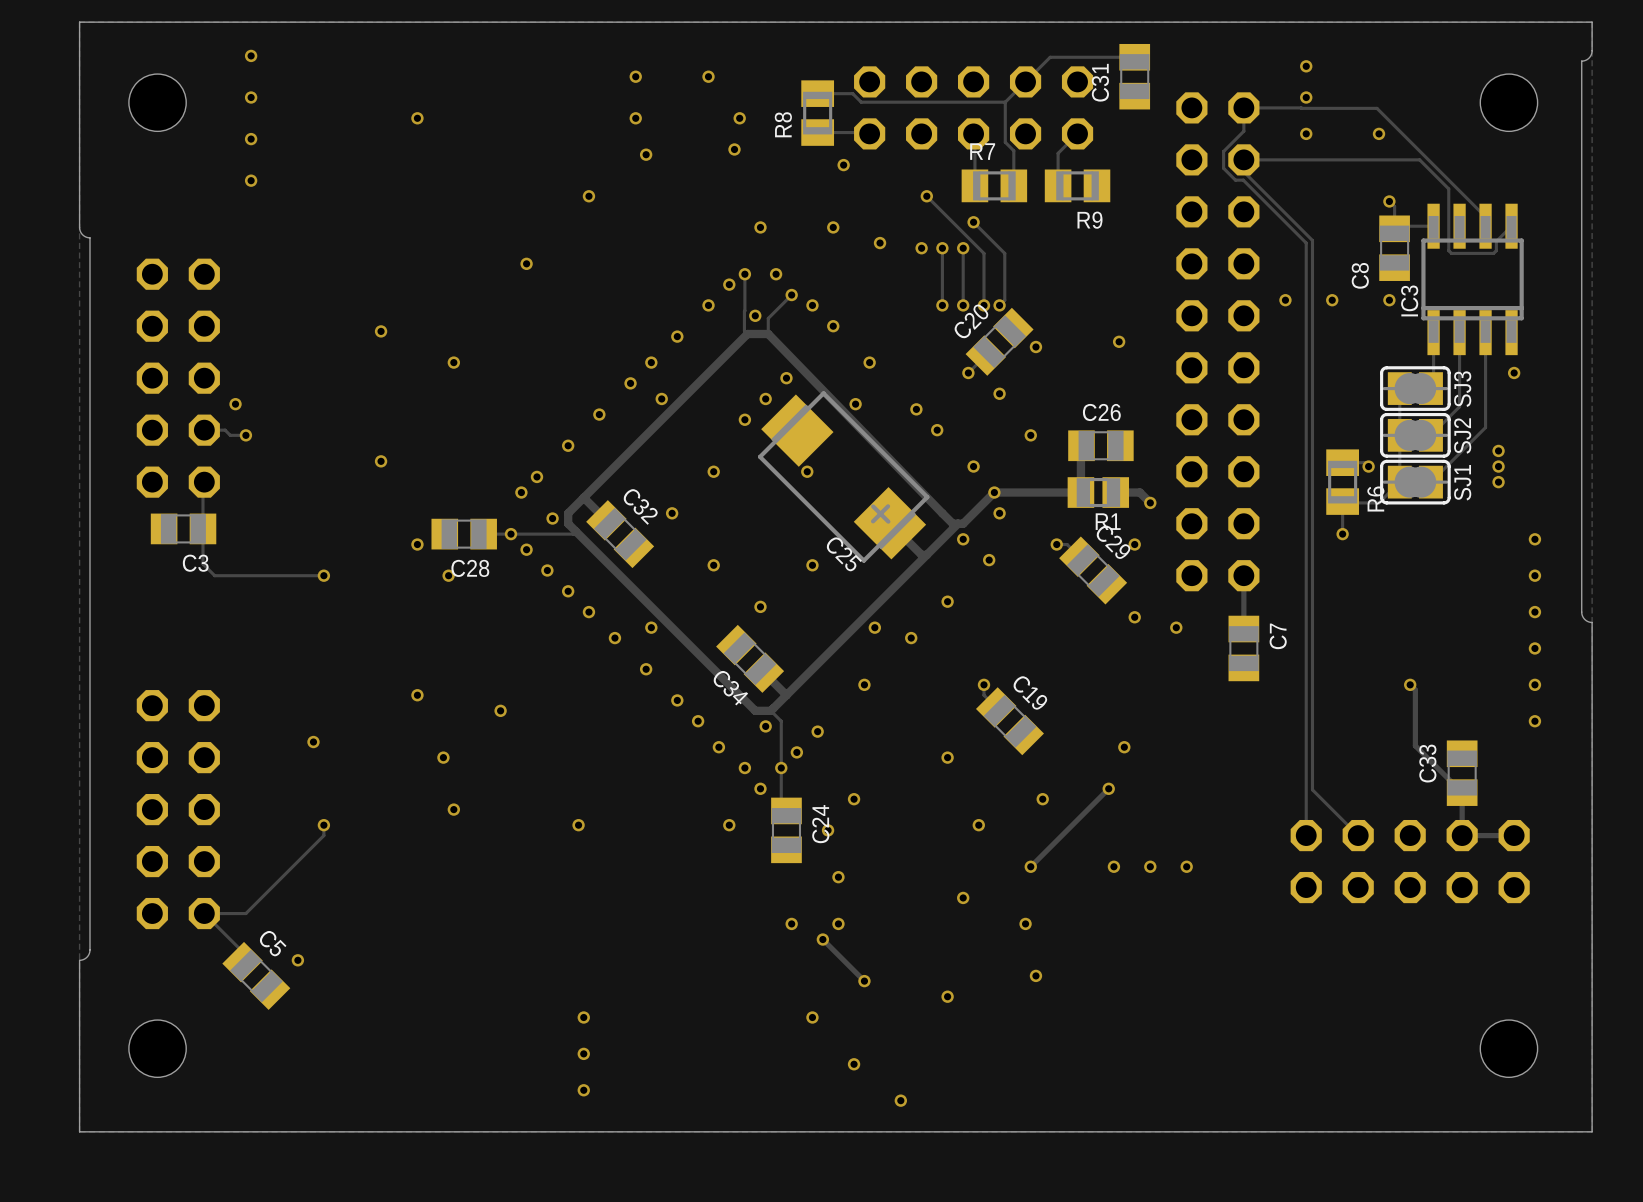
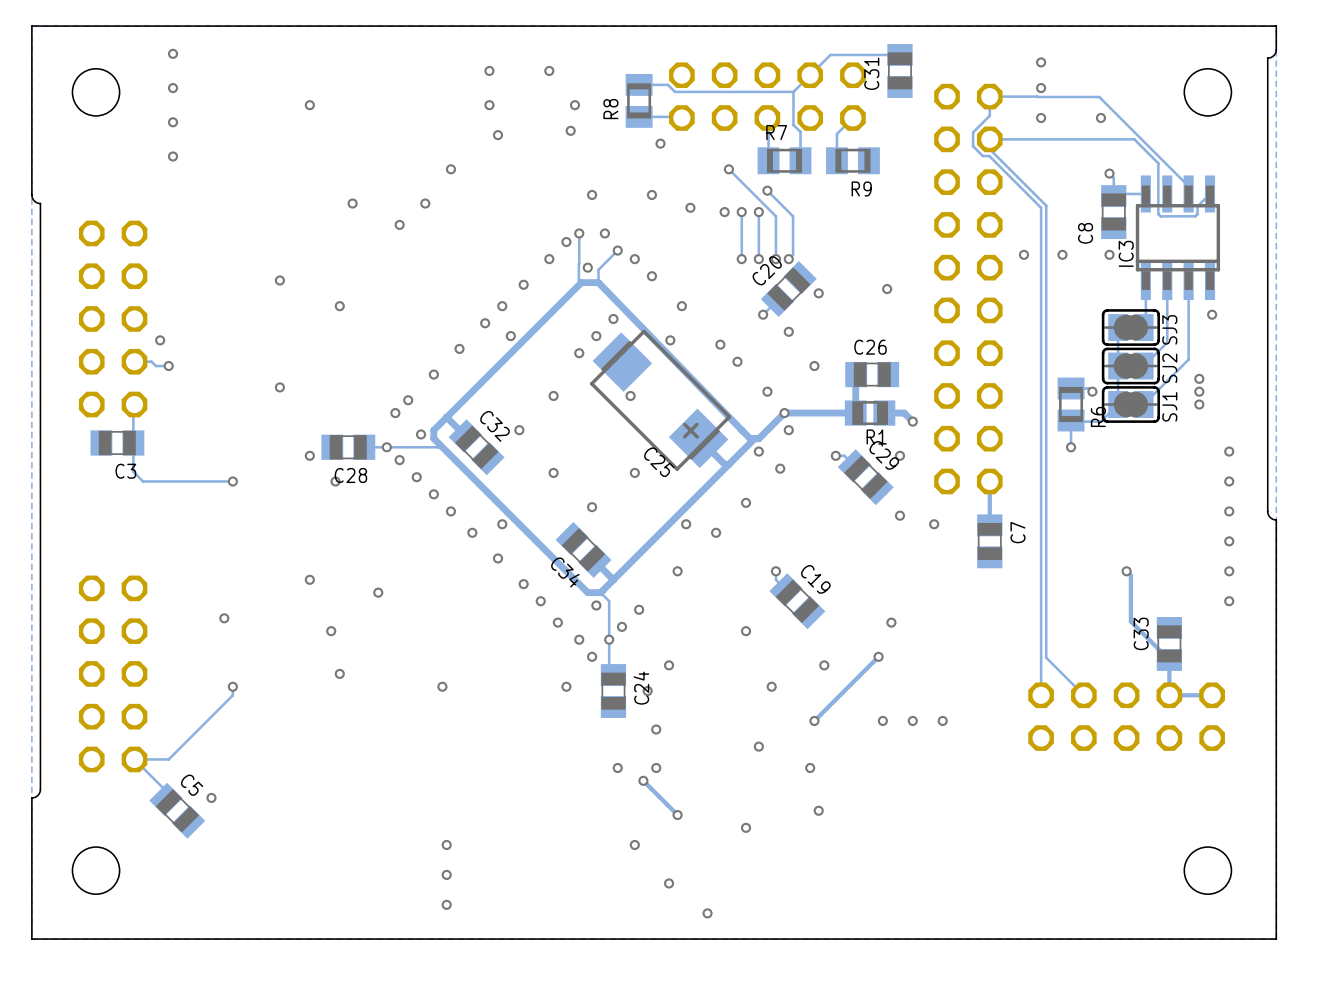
via: none -> (352, 203)
via: none -> (425, 203)

